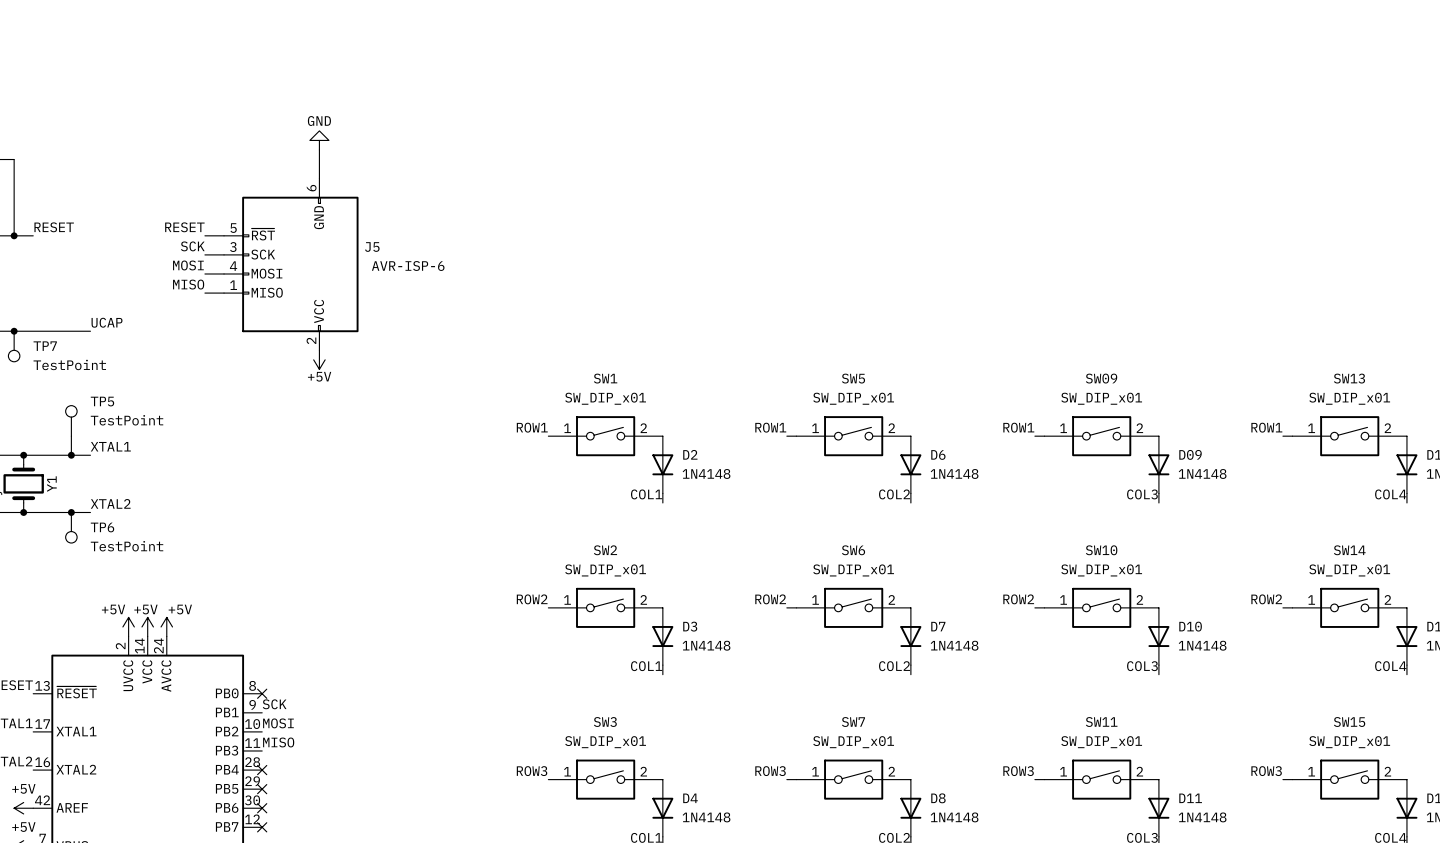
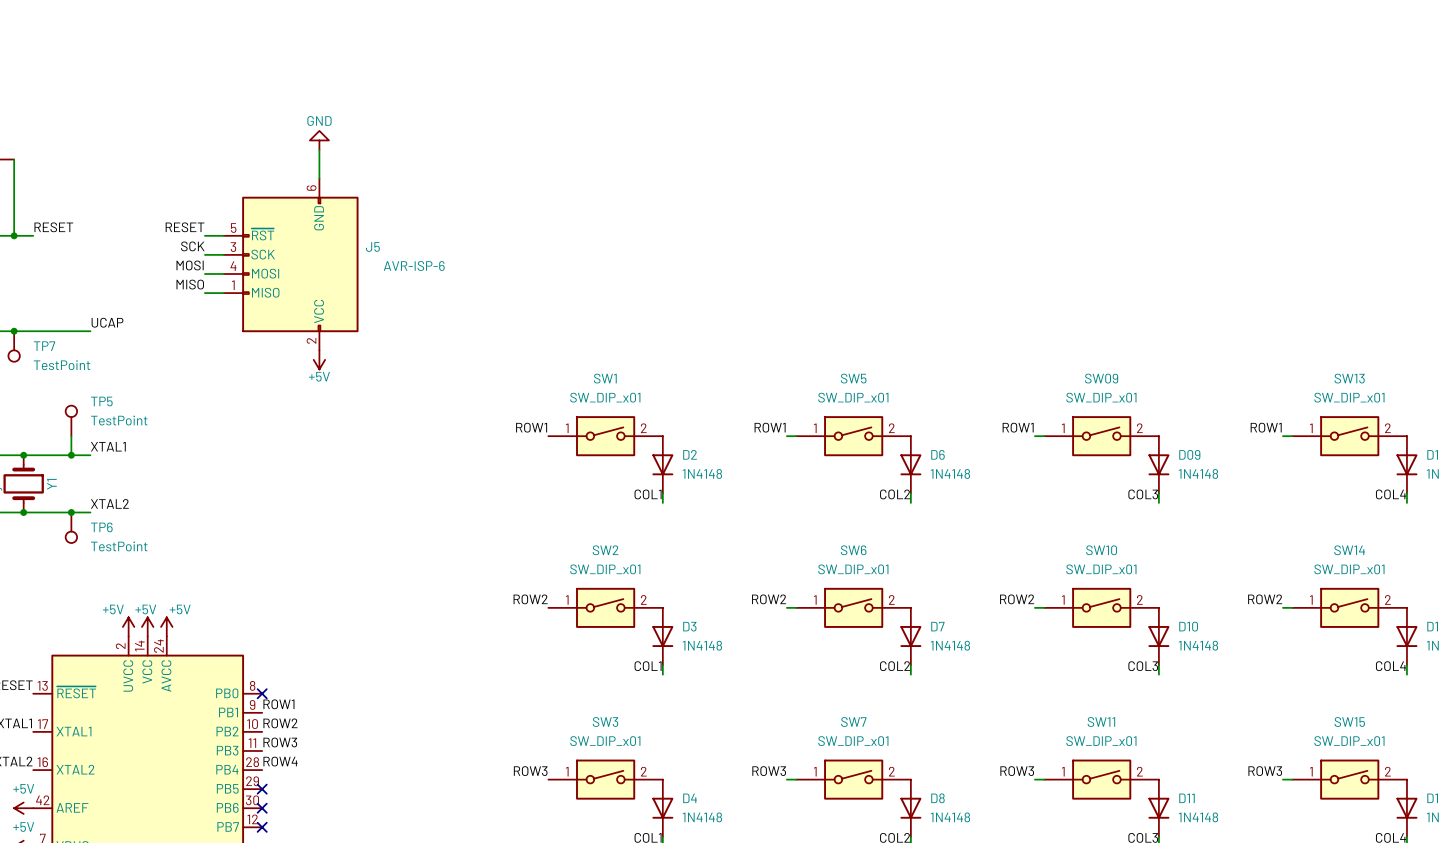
label: SCK (274, 704) -> ROW1 (278, 704)
label: MOSI (278, 723) -> ROW2 (280, 723)
label: MISO (278, 742) -> ROW3 (280, 742)
label: none -> ROW4 (280, 761)
no-connect mark: (262, 770) -> none

